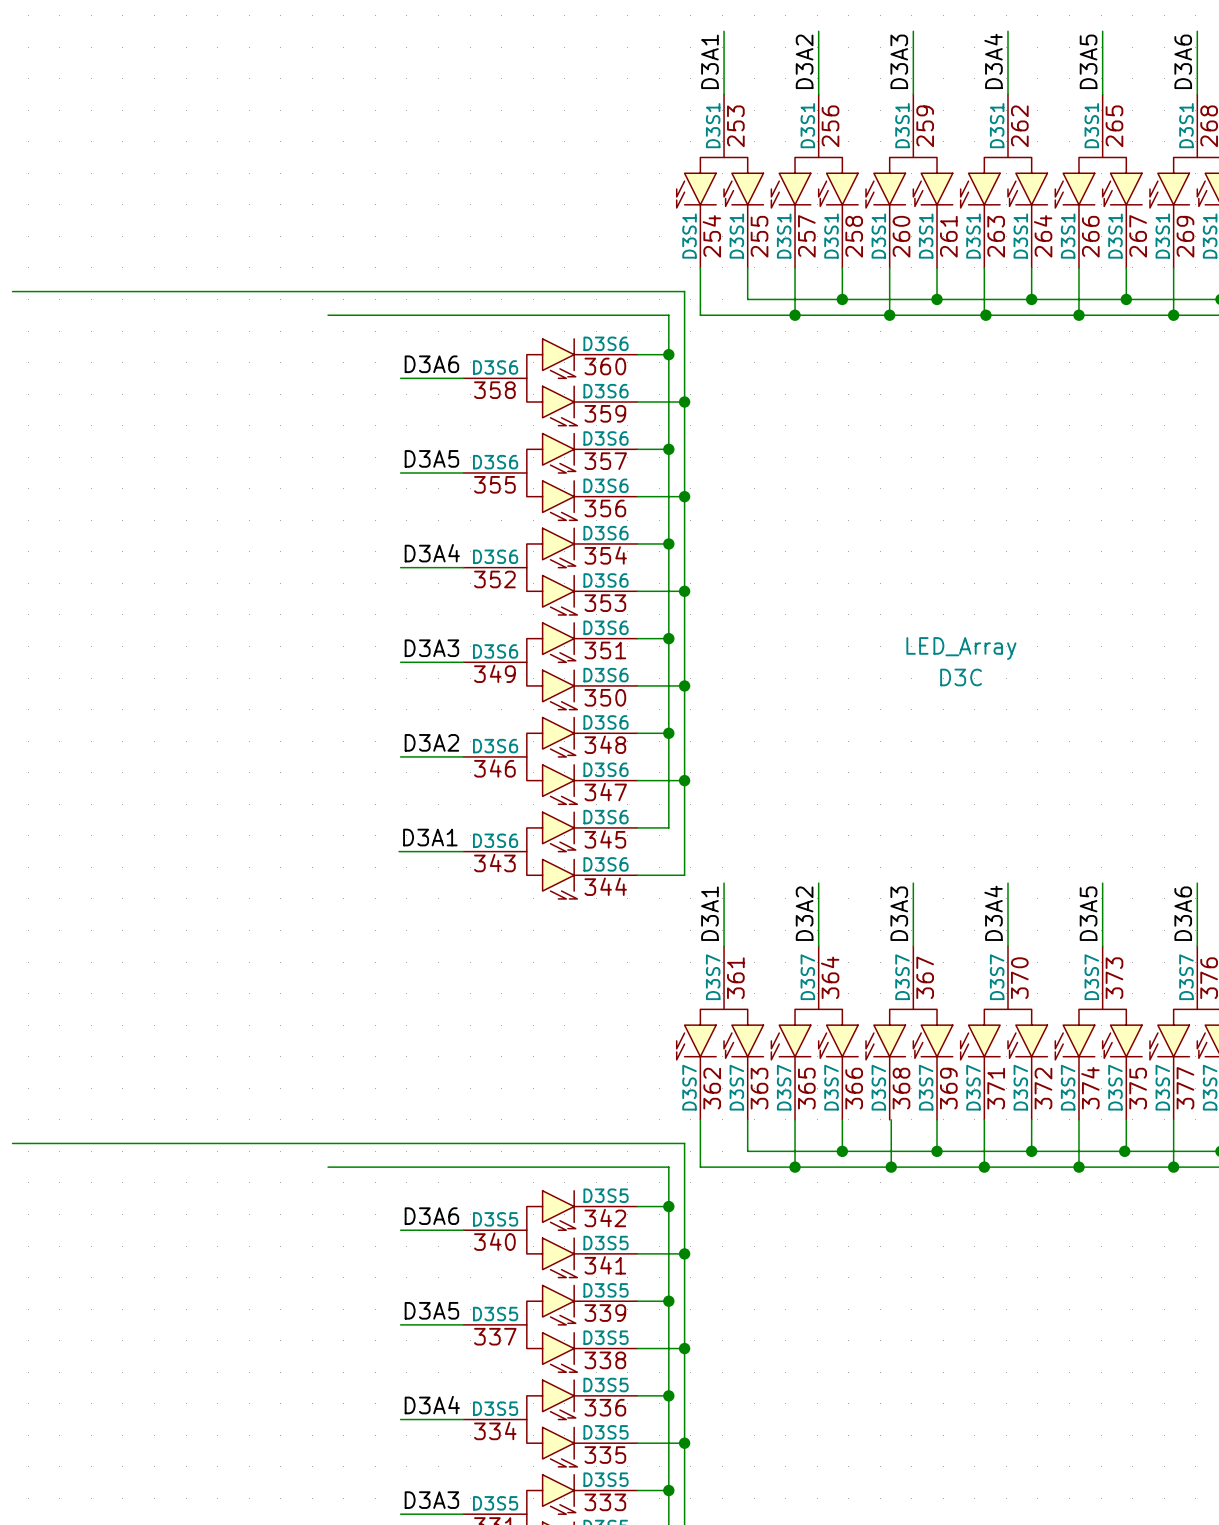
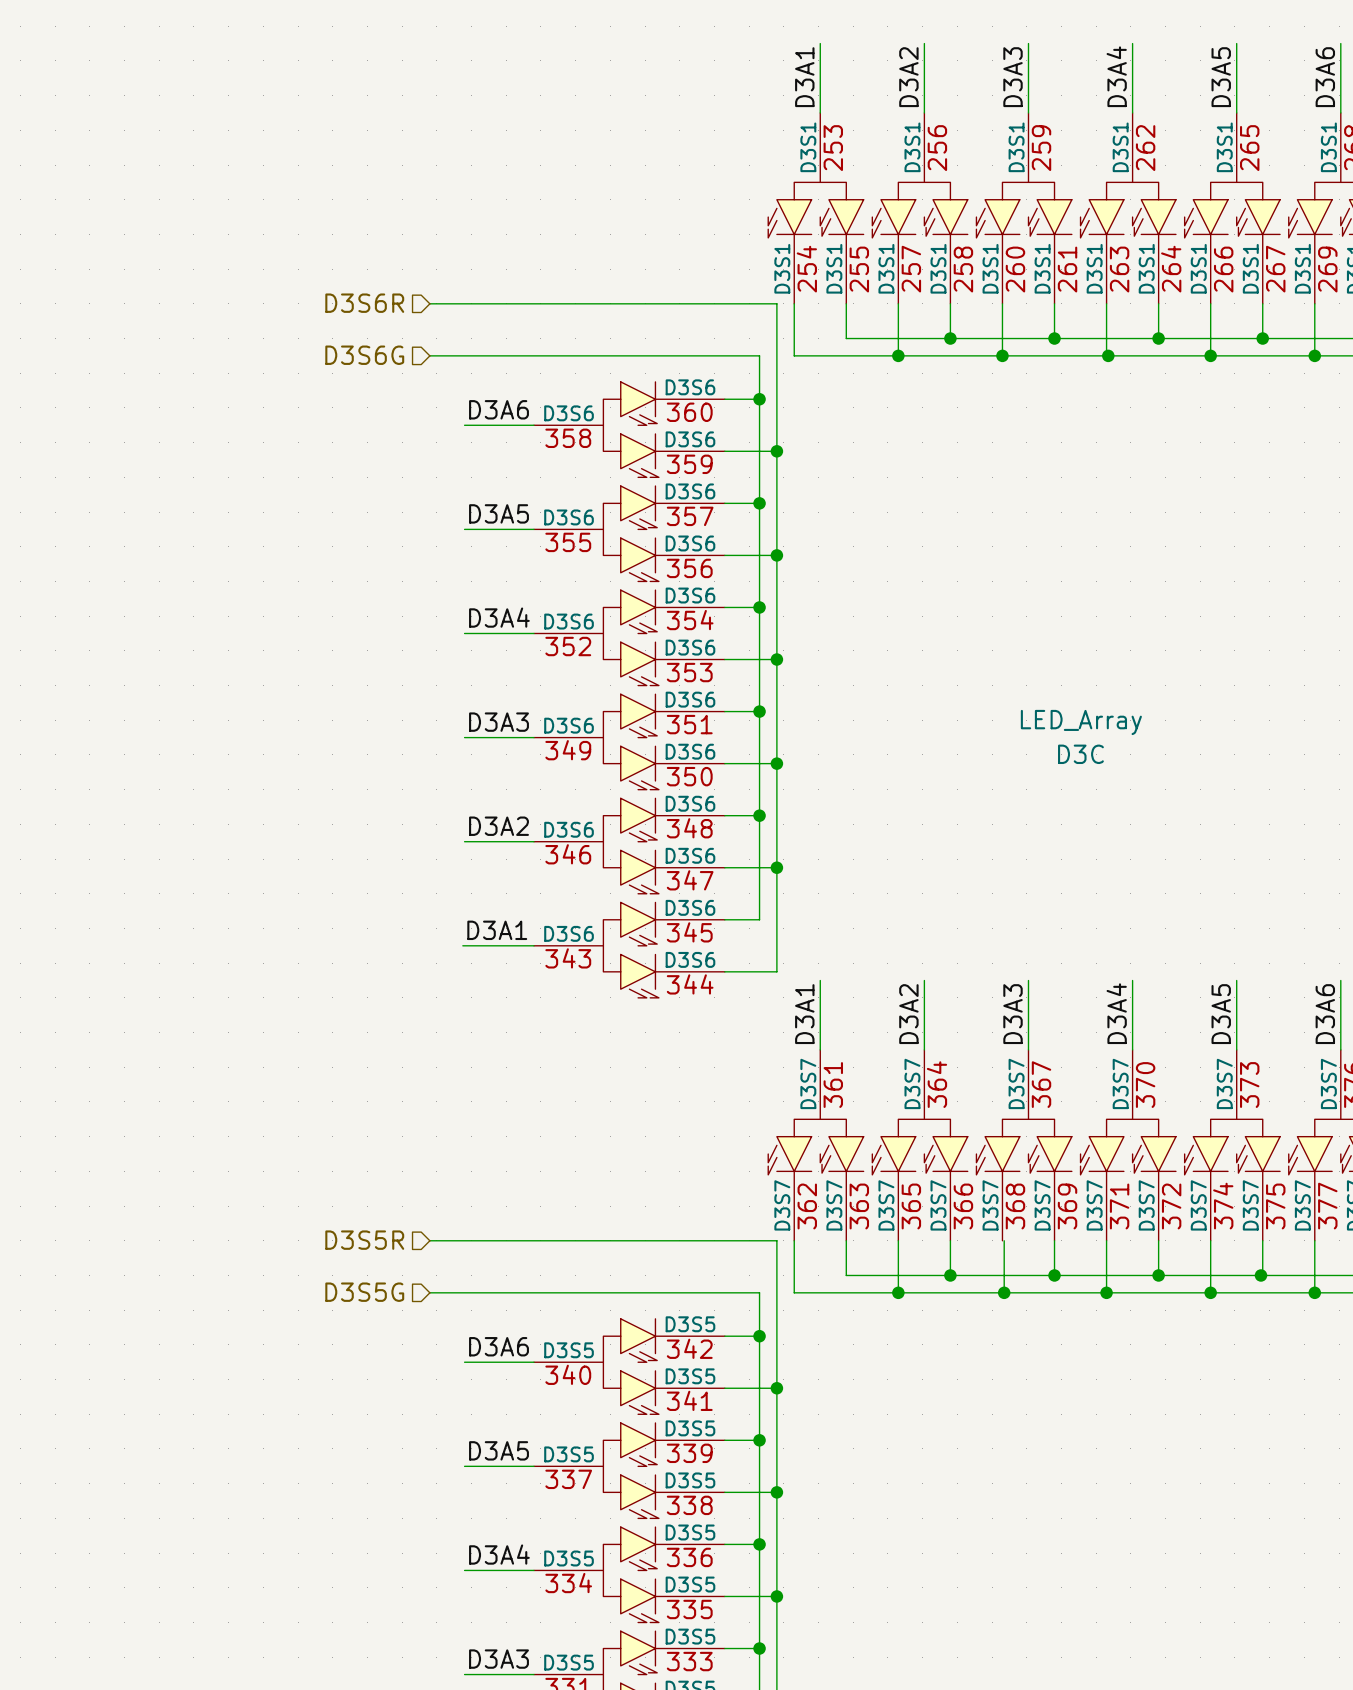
hierarchical label: none -> D3S6R (364, 303)
wire: (12, 291) (684, 291) -> (429, 303) (776, 303) (776, 329)
hierarchical label: none -> D3S6G (364, 355)
wire: (328, 315) (369, 315) -> none
hierarchical label: none -> D3S5R (364, 1240)
wire: (12, 1143) (684, 1143) -> (429, 1240) (776, 1240) (776, 1266)
hierarchical label: none -> D3S5G (364, 1292)
wire: (328, 1167) (369, 1167) -> none

